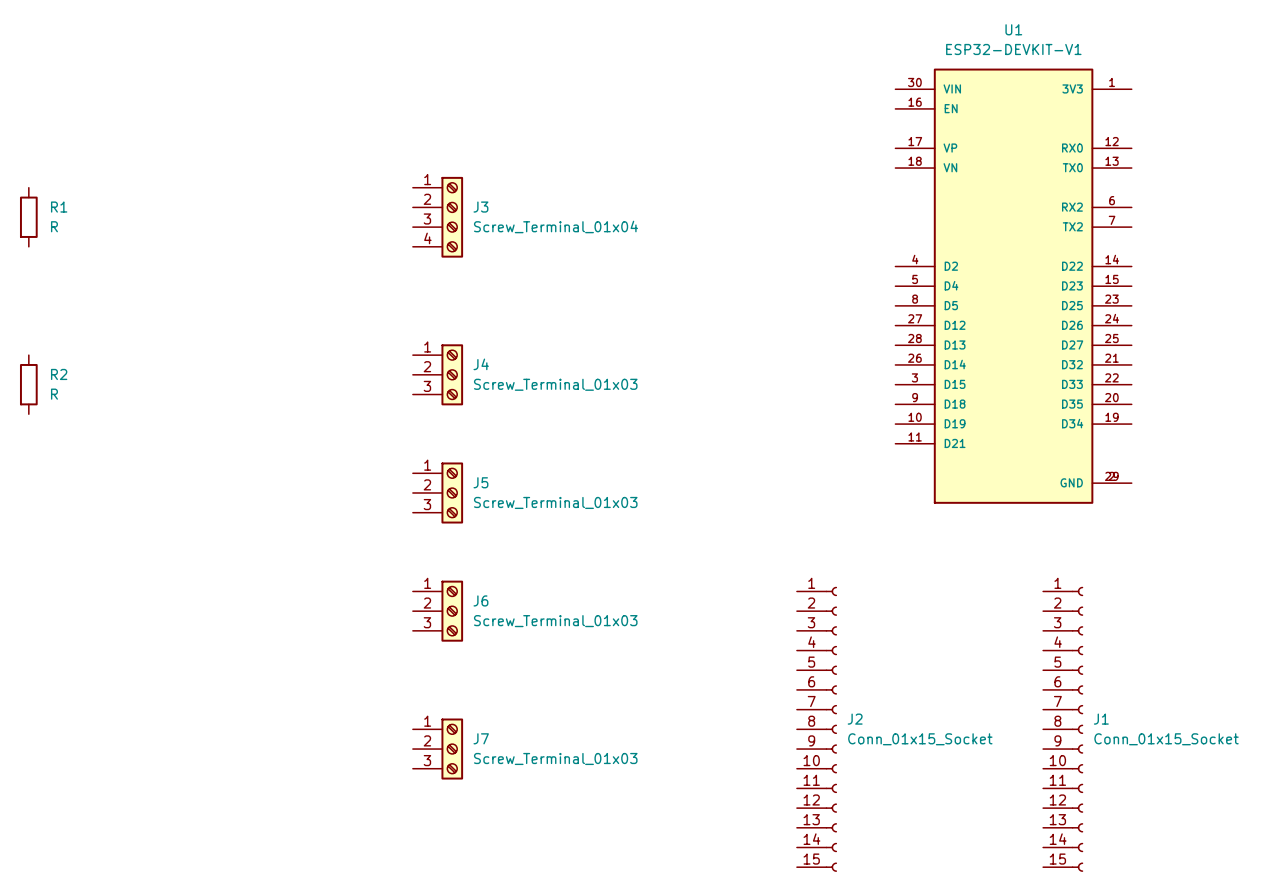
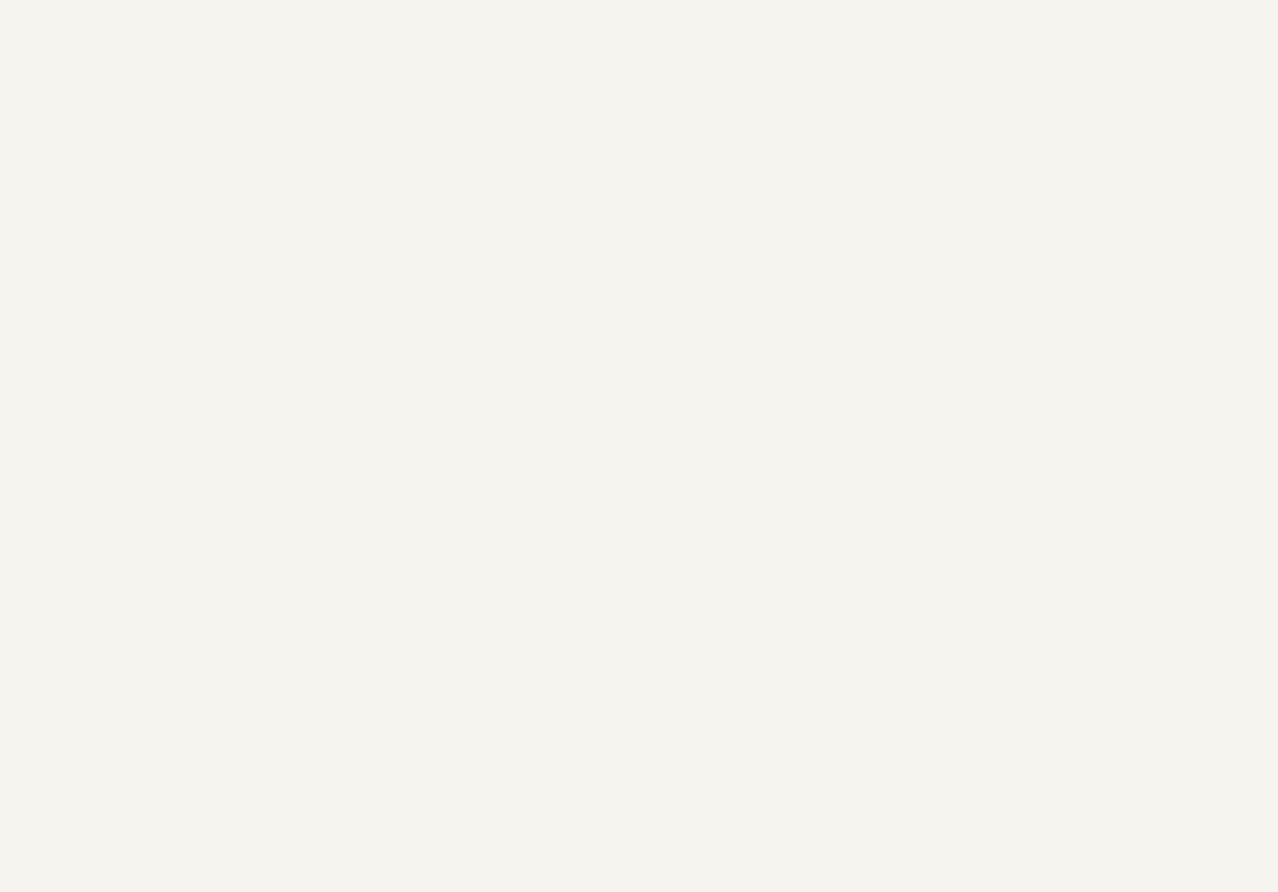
R1: R (28, 217) -> none
J3: Screw_Terminal_01x04 (437, 217) -> none
U1: ESP32-DEVKIT-V1 (1013, 286) -> none
J4: Screw_Terminal_01x03 (437, 374) -> none
R2: R (28, 384) -> none
J5: Screw_Terminal_01x03 (437, 492) -> none
J6: Screw_Terminal_01x03 (437, 611) -> none
J2: Conn_01x15_Socket (816, 729) -> none
J1: Conn_01x15_Socket (1063, 729) -> none
J7: Screw_Terminal_01x03 (437, 749) -> none

